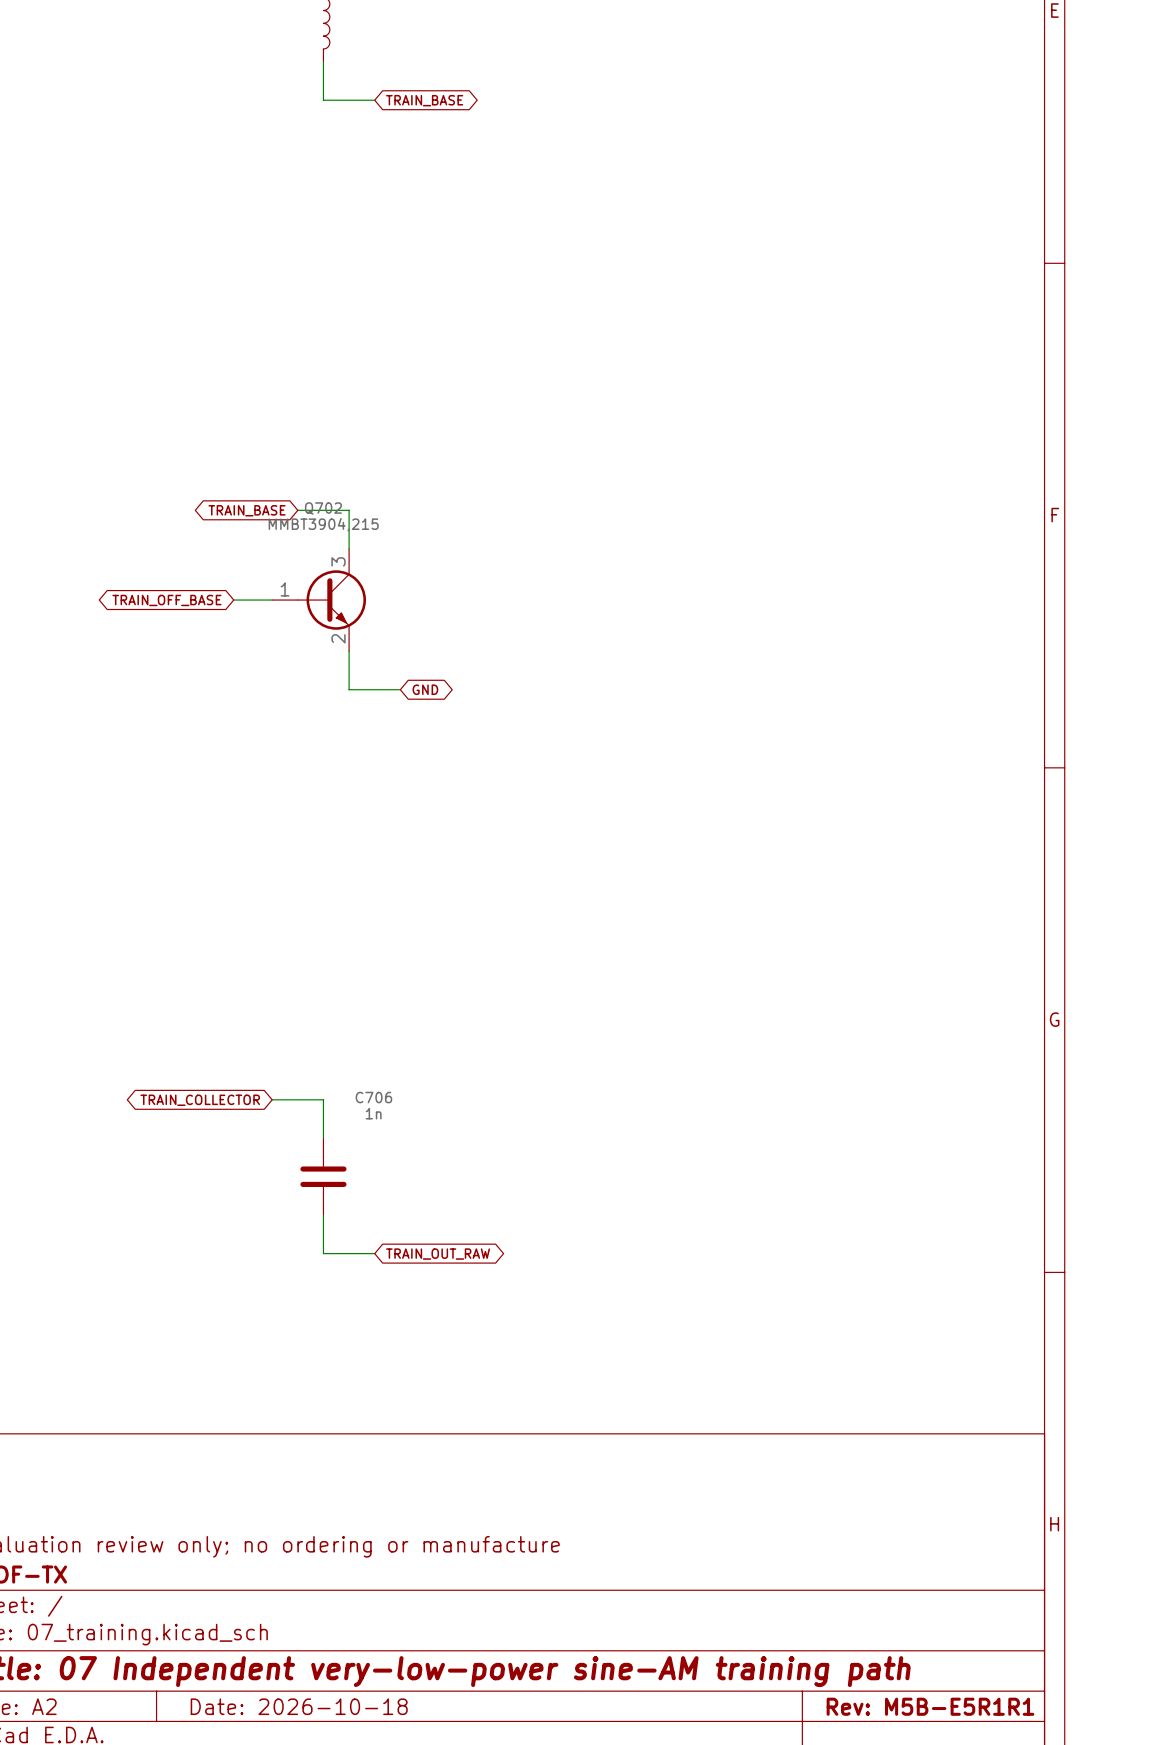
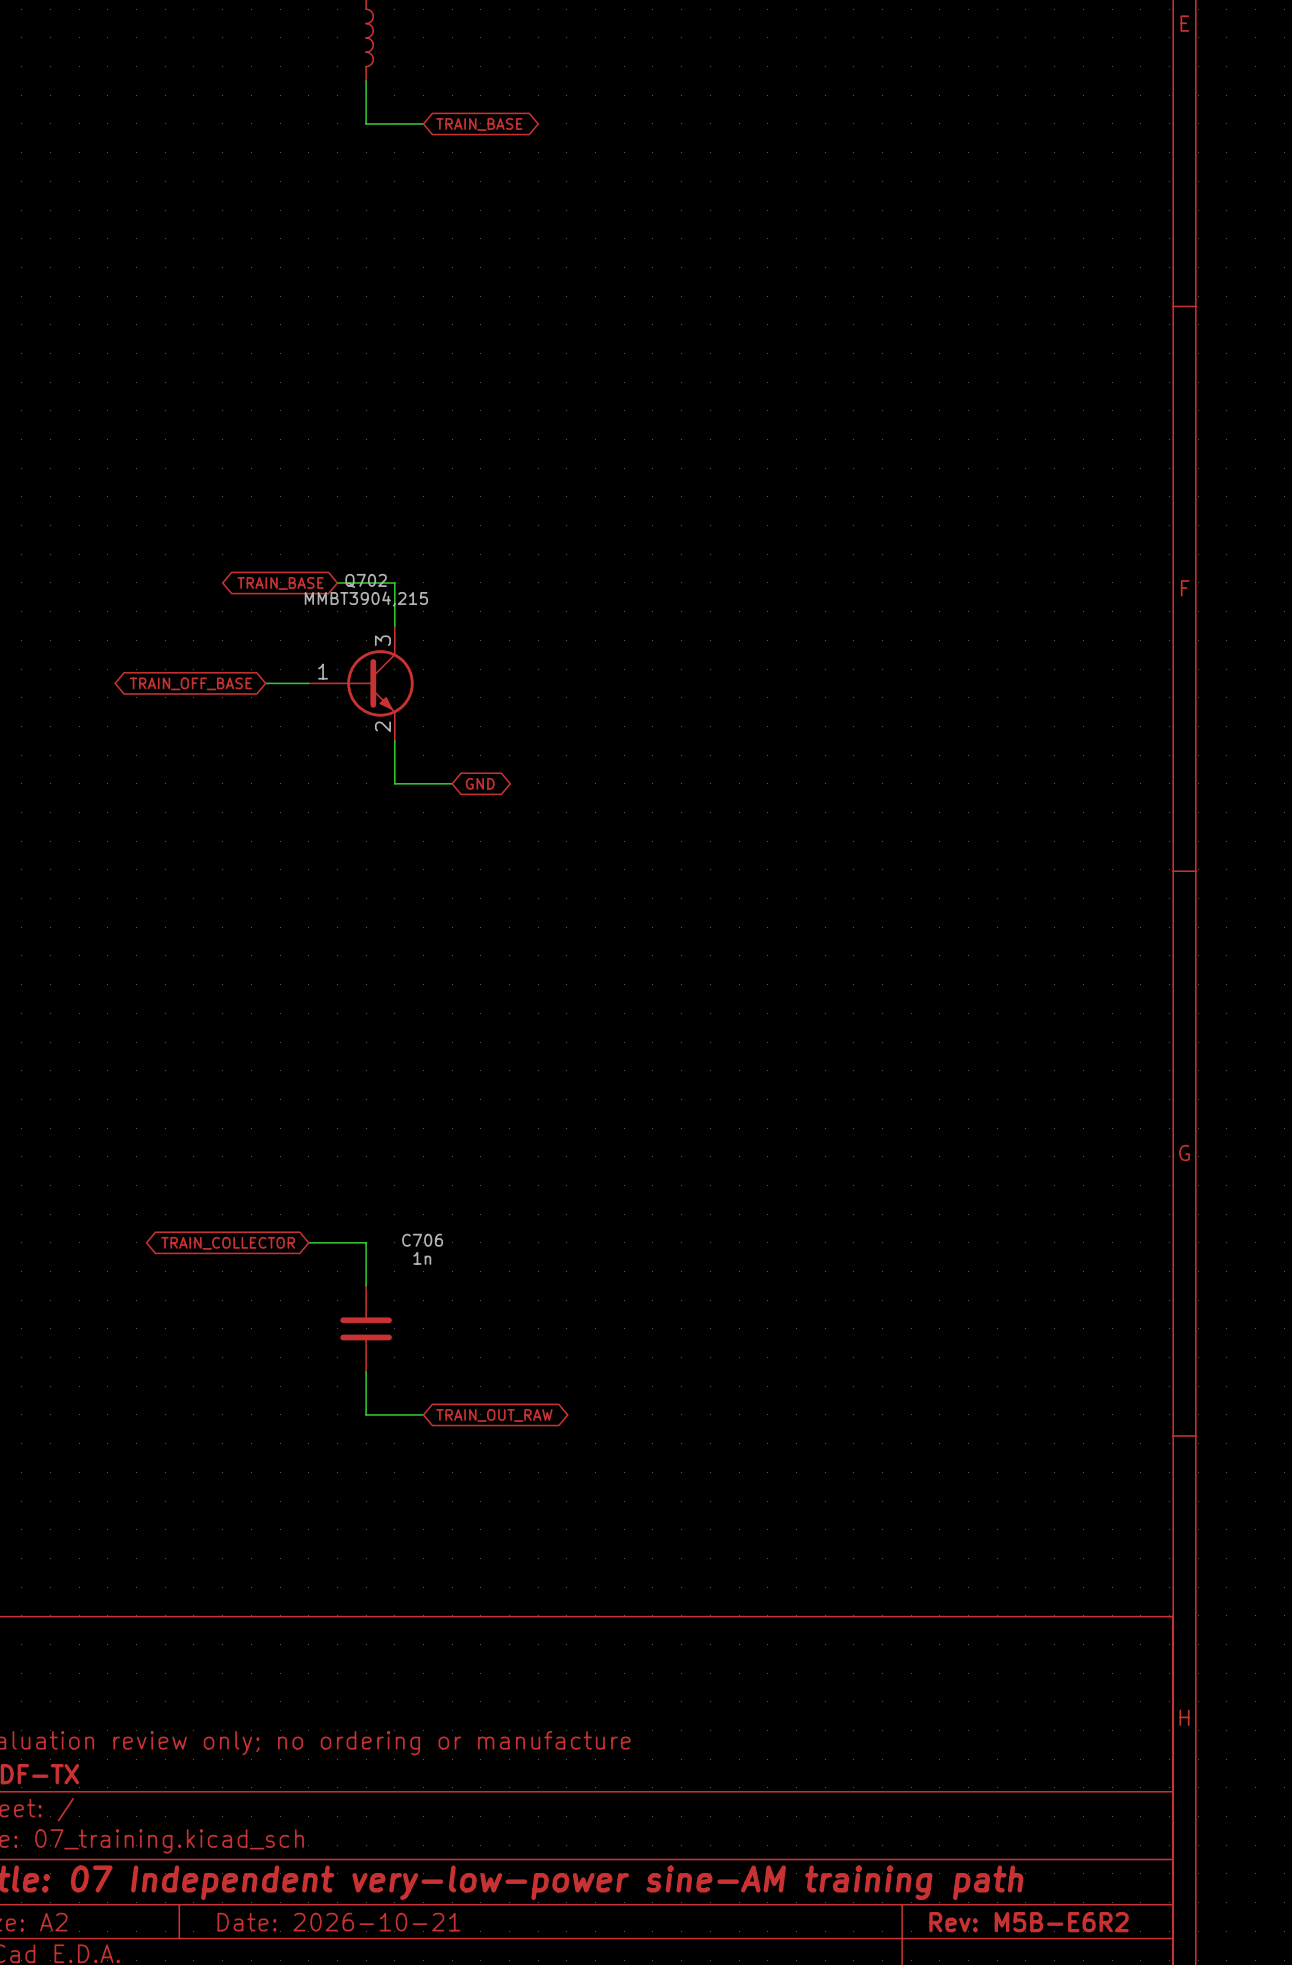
title block: Date: 2026-10-18 (299, 1706) -> Date: 2026-10-21 (338, 1922)
title block: Rev: M5B-E5R1R1 (930, 1706) -> Rev: M5B-E6R2 (1029, 1922)

